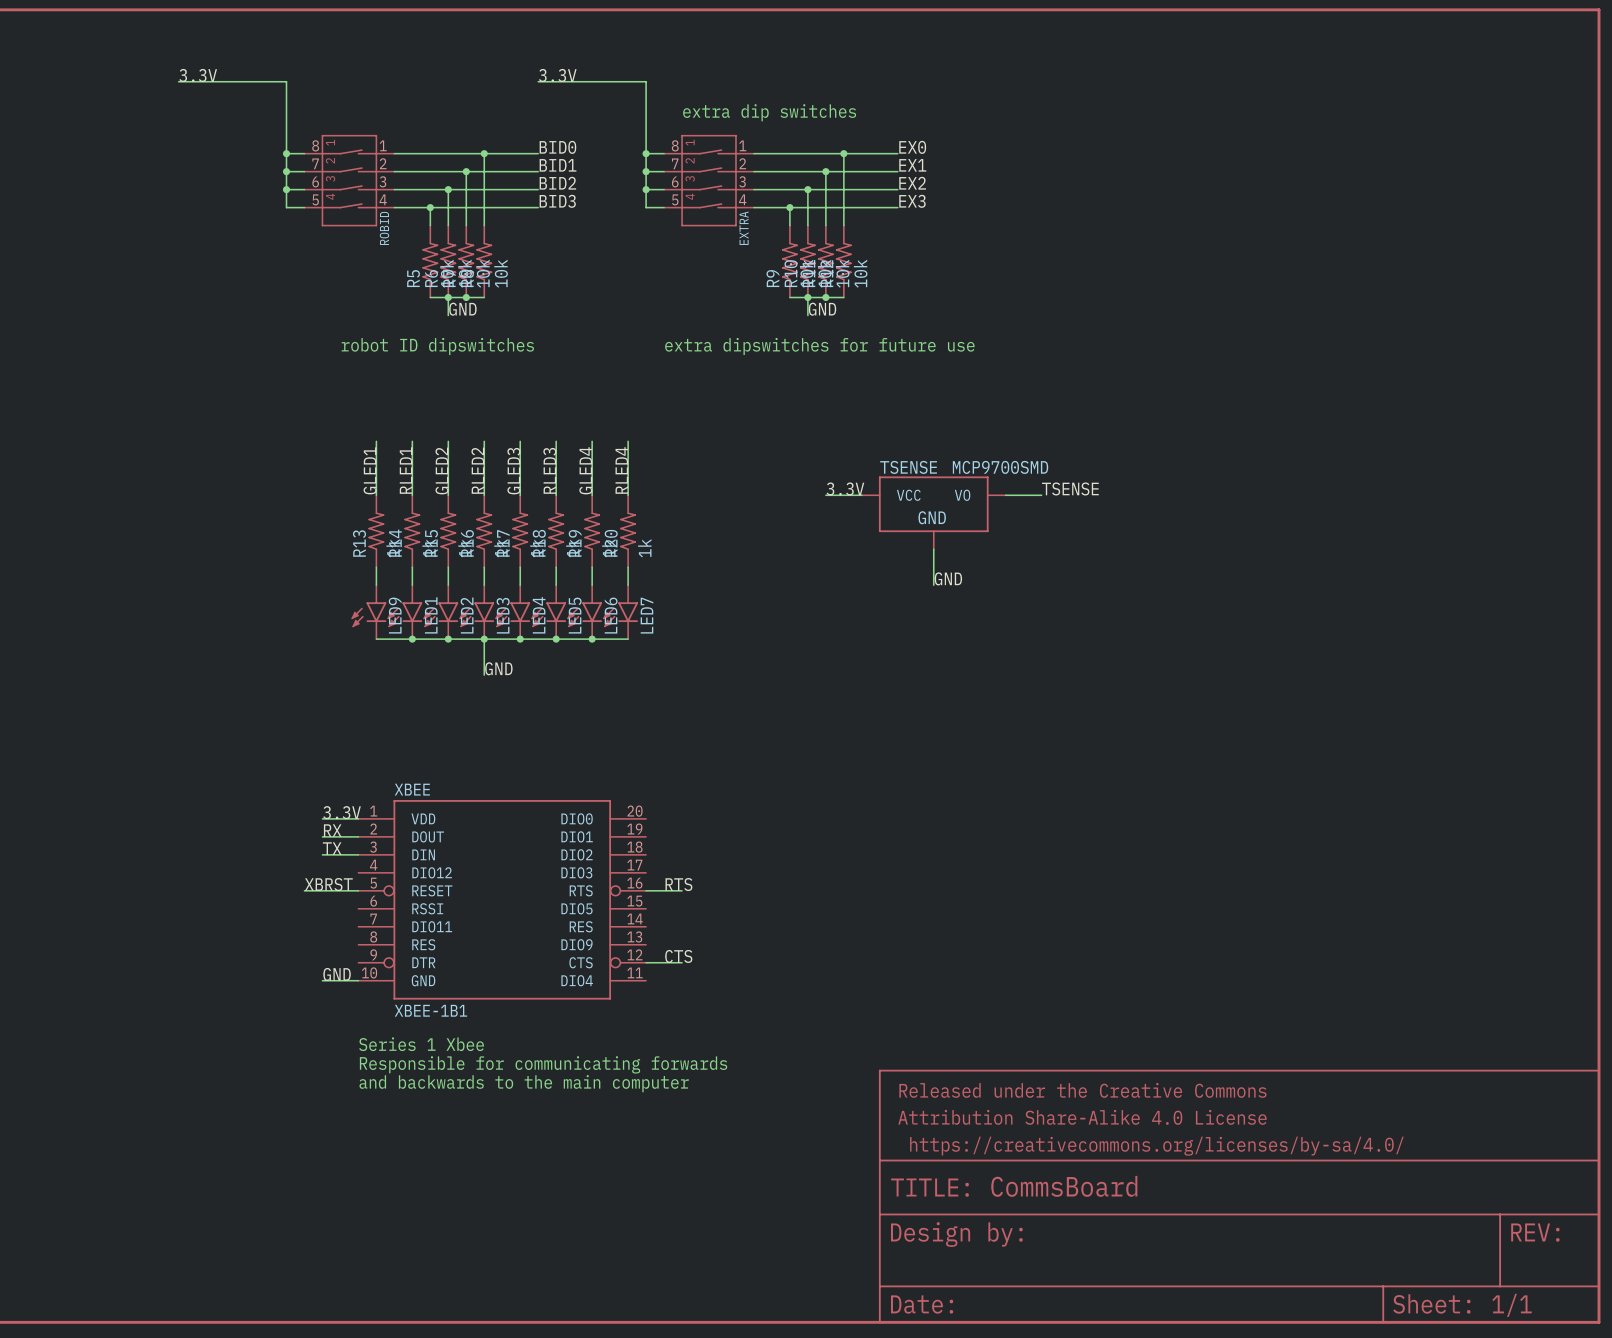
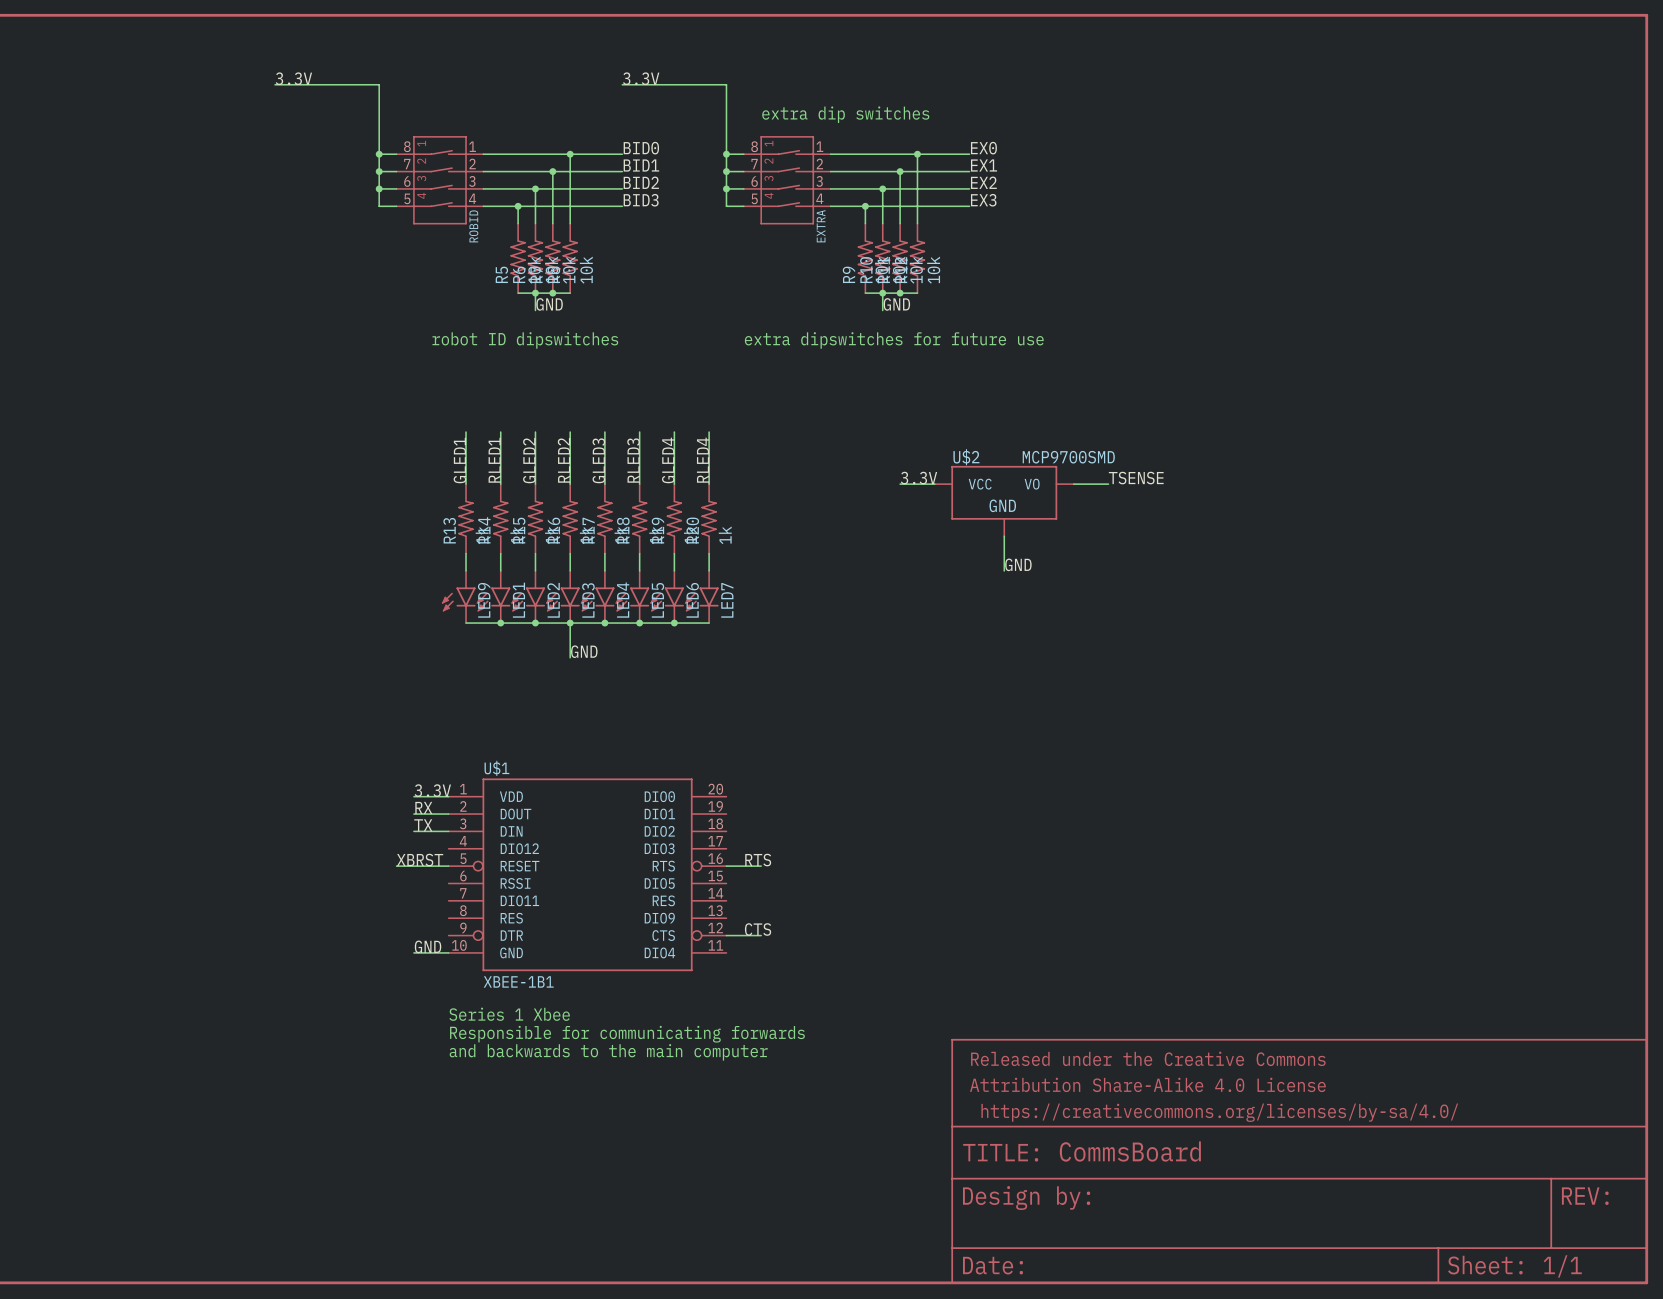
TSENSE name: TSENSE (908, 467) -> U$2 (966, 457)
XBEE name: XBEE (412, 789) -> U$1 (496, 768)

